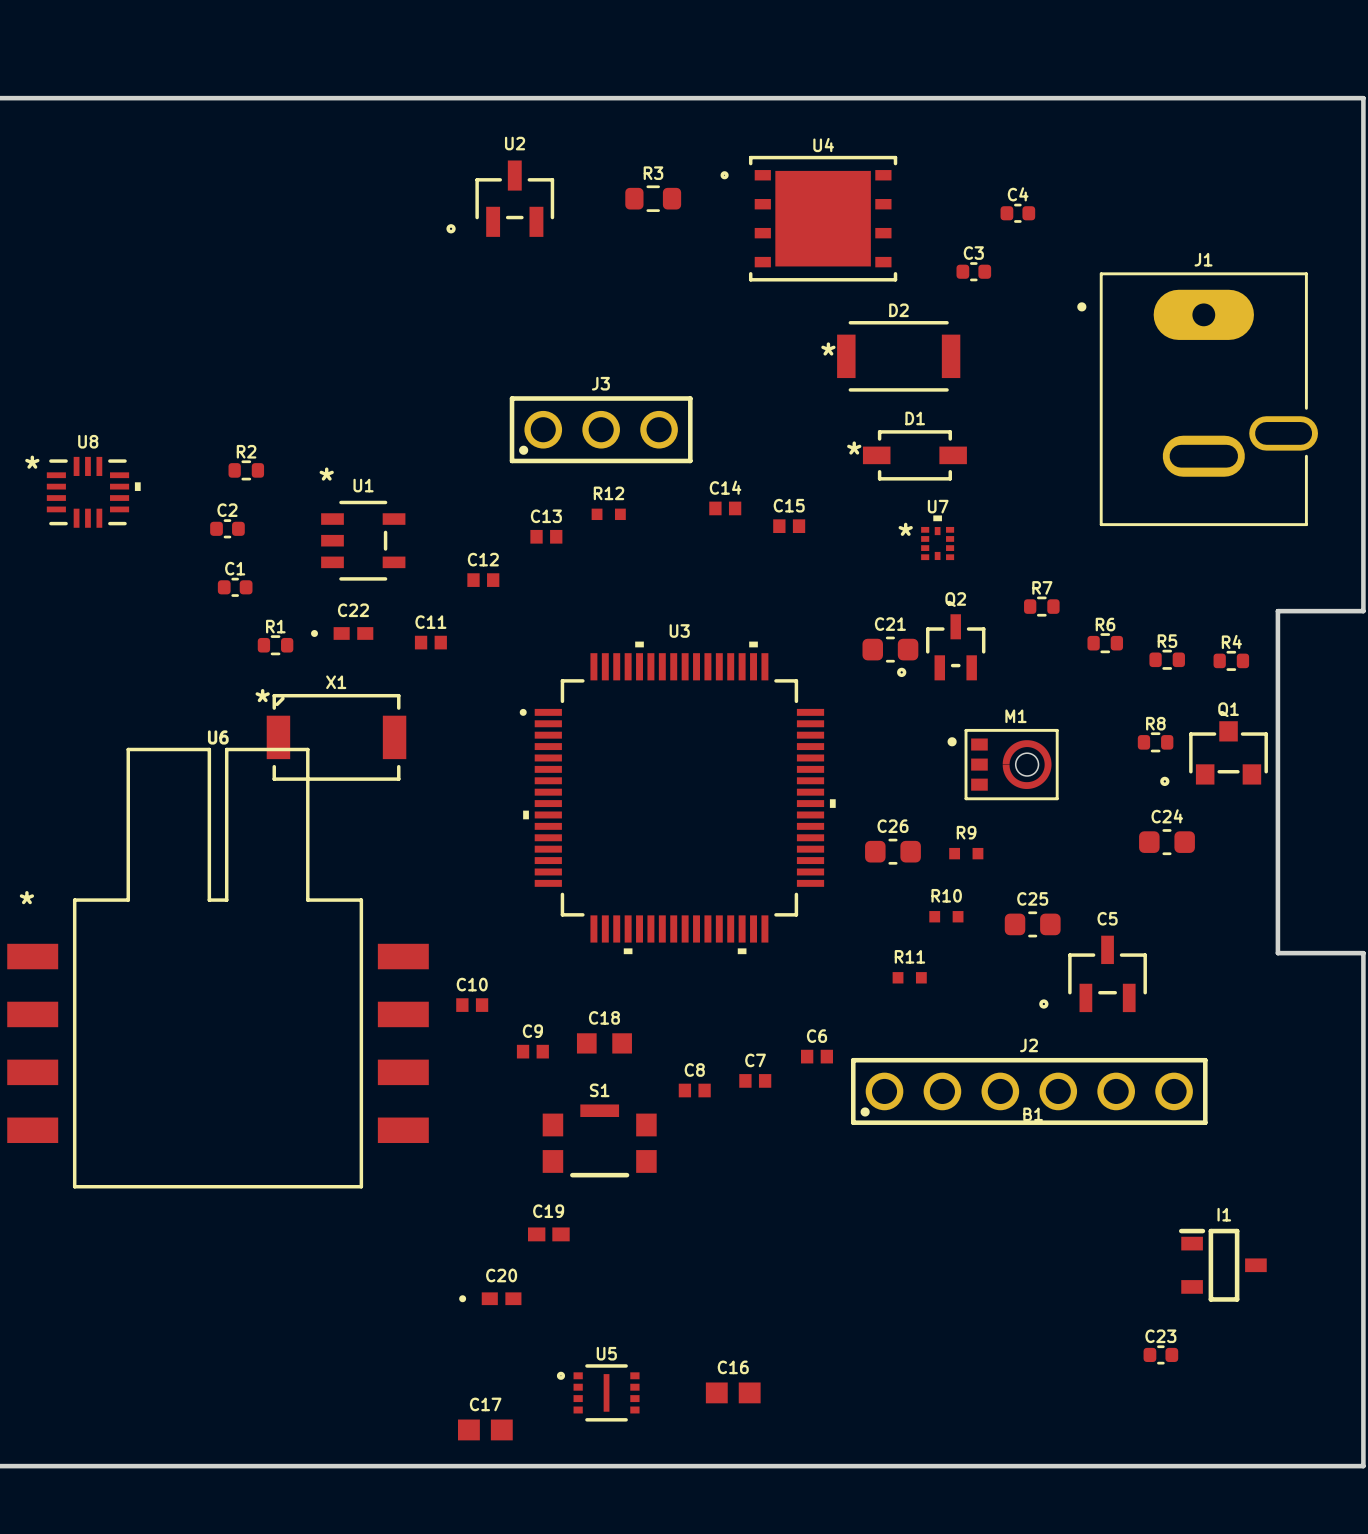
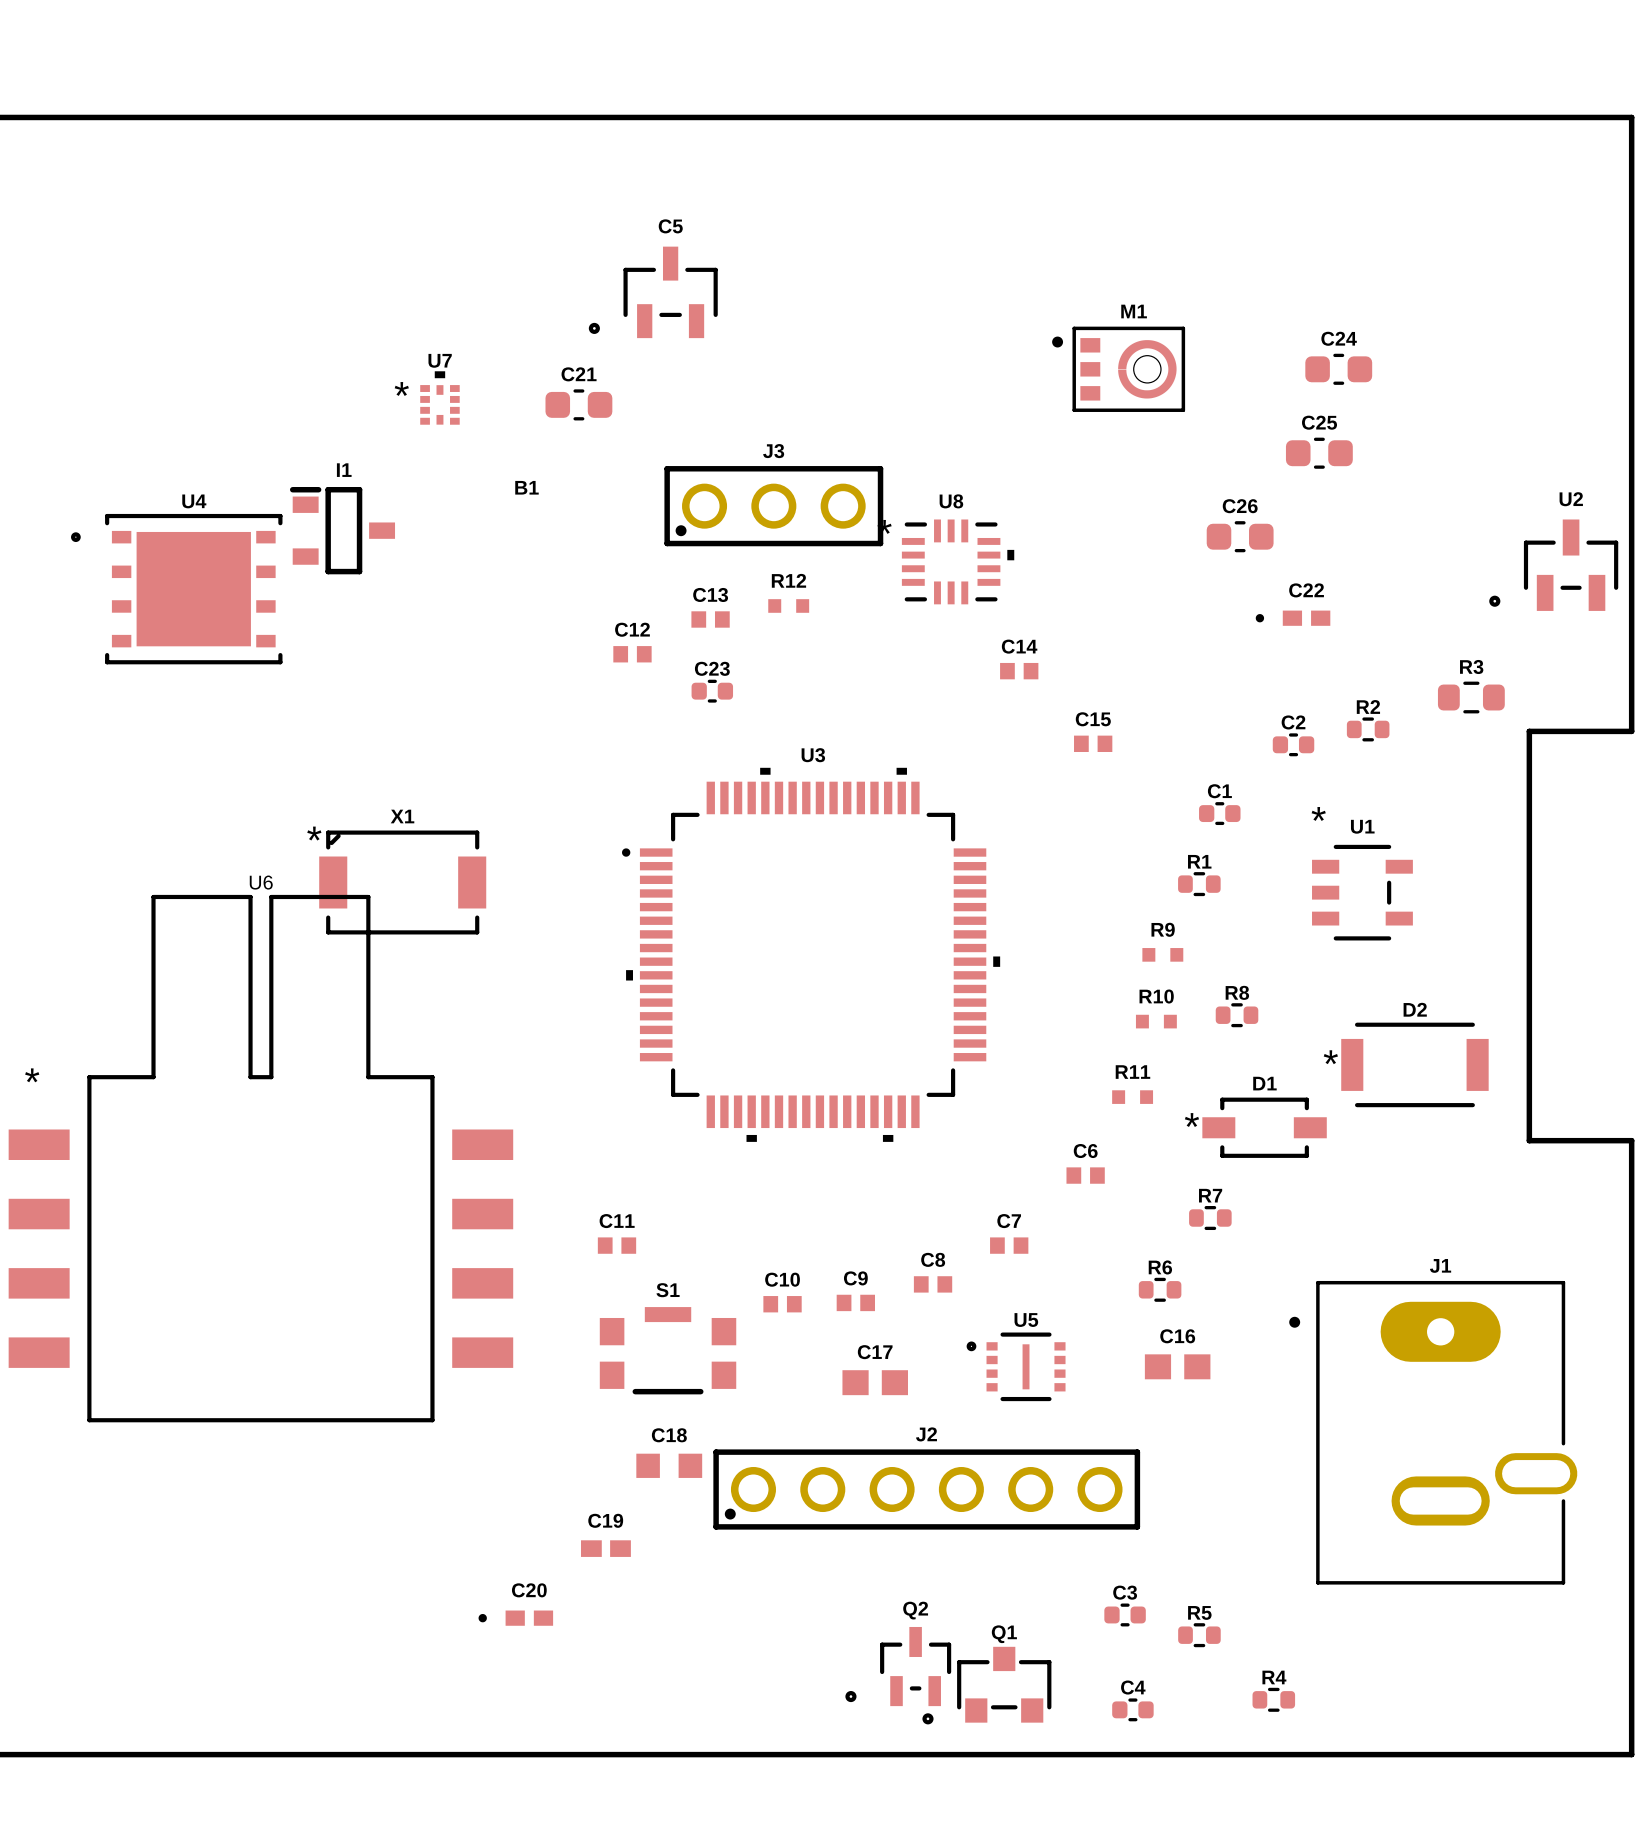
U2 position: (500, 198) -> (1553, 565)
R3 position: (653, 198) -> (1471, 697)
C4 position: (1017, 213) -> (1132, 1709)
U4 position: (808, 218) -> (176, 589)
C3 position: (973, 271) -> (1125, 1614)
D2 position: (898, 356) -> (1414, 1064)
J1 position: (1197, 399) -> (1433, 1432)
J3 position: (601, 429) -> (773, 506)
D1 position: (914, 455) -> (1264, 1127)
R2 position: (246, 470) -> (1368, 729)
U8 position: (93, 492) -> (958, 561)
C14 position: (725, 508) -> (1019, 671)
R12 position: (608, 514) -> (788, 605)
C15 position: (789, 526) -> (1093, 743)
C2 position: (227, 528) -> (1293, 744)
C13 position: (546, 536) -> (710, 619)
U7 position: (937, 537) -> (439, 398)
U1 position: (363, 540) -> (1362, 892)
C12 position: (483, 580) -> (632, 654)
C1 position: (235, 587) -> (1219, 813)
R7 position: (1041, 606) -> (1210, 1218)
C22 position: (342, 633) -> (1293, 618)
C11 position: (430, 642) -> (616, 1245)
R6 position: (1105, 643) -> (1160, 1289)
R1 position: (275, 645) -> (1199, 884)
Q2 position: (941, 647) -> (898, 1666)
C21 position: (890, 649) -> (578, 404)
R5 position: (1167, 659) -> (1199, 1635)
R4 position: (1231, 660) -> (1273, 1699)
R8 position: (1155, 742) -> (1237, 1015)
Q1 position: (1214, 753) -> (986, 1685)
M1 position: (1003, 764) -> (1118, 369)
R9: none -> (1162, 954)
R9 name: R9 (966, 832) -> R10 (1156, 996)
C24 position: (1166, 842) -> (1338, 369)
C26 position: (892, 851) -> (1240, 536)
R10 name: R10 (946, 895) -> R11 (1132, 1072)
C25 position: (1032, 924) -> (1319, 453)
C5 position: (1093, 973) -> (653, 292)
R11: (909, 977) -> none
C10 position: (472, 1005) -> (782, 1304)
C18 position: (604, 1043) -> (669, 1465)
C9 position: (532, 1051) -> (855, 1302)
C6 position: (816, 1056) -> (1085, 1175)
C7 position: (755, 1080) -> (1009, 1245)
C8 position: (694, 1090) -> (933, 1284)
J2 position: (1029, 1091) -> (926, 1489)
B1 position: (1033, 1114) -> (526, 487)
S1 position: (599, 1140) -> (668, 1350)
C19 position: (548, 1234) -> (605, 1548)
I1 position: (1222, 1265) -> (342, 530)
C20 position: (490, 1298) -> (515, 1618)
C23 position: (1160, 1354) -> (712, 691)
U5 position: (598, 1392) -> (1016, 1366)
C16 position: (733, 1392) -> (1177, 1366)
C17 position: (485, 1429) -> (875, 1382)

